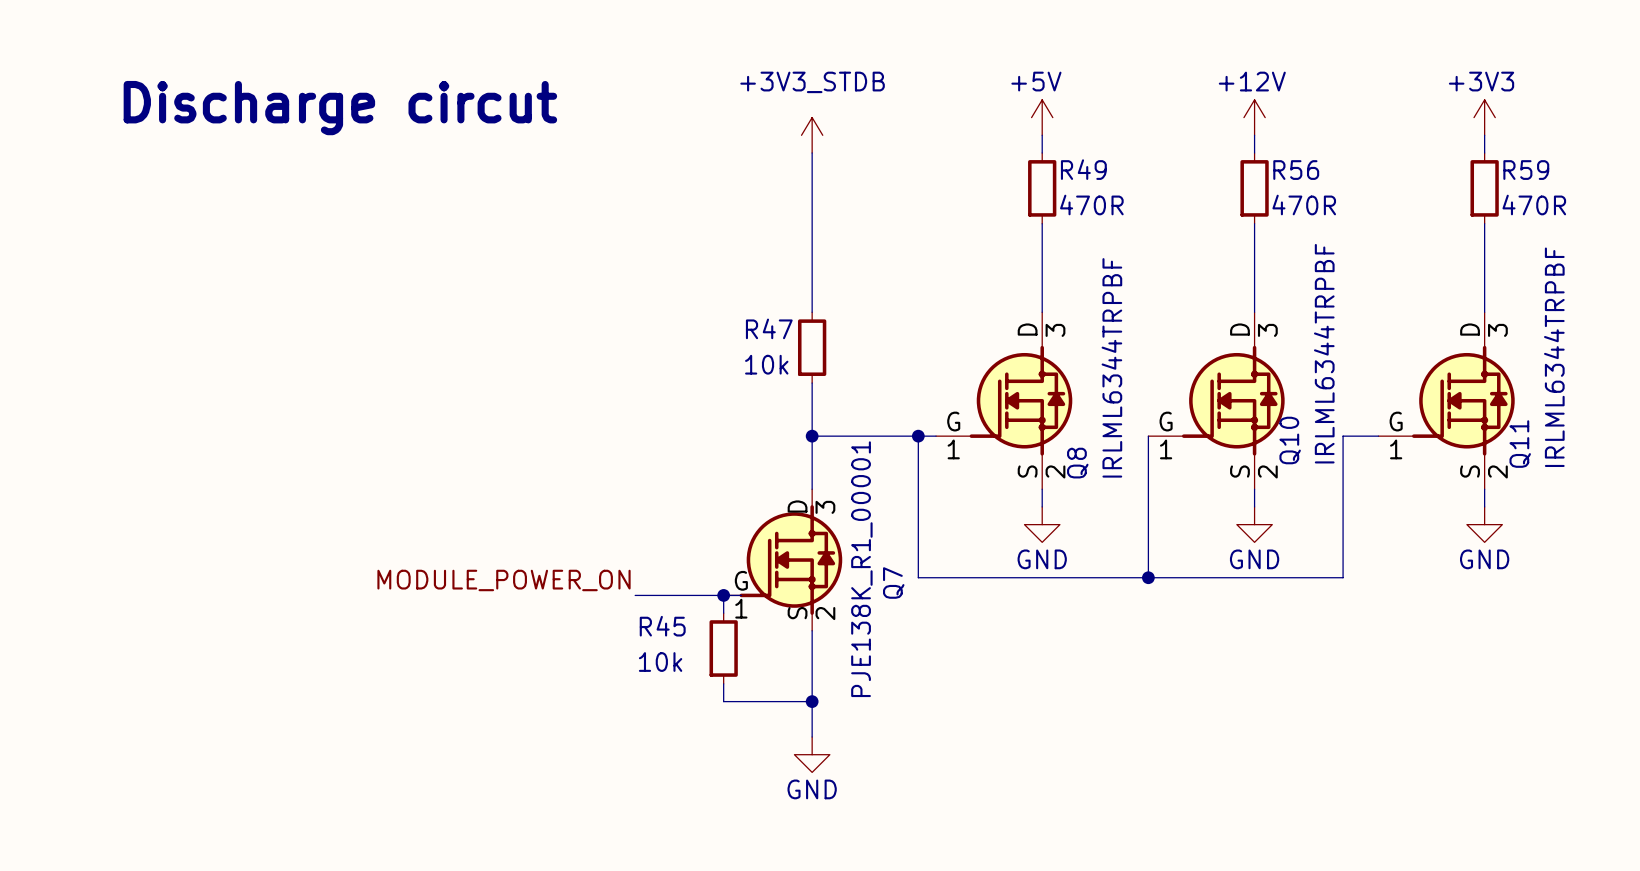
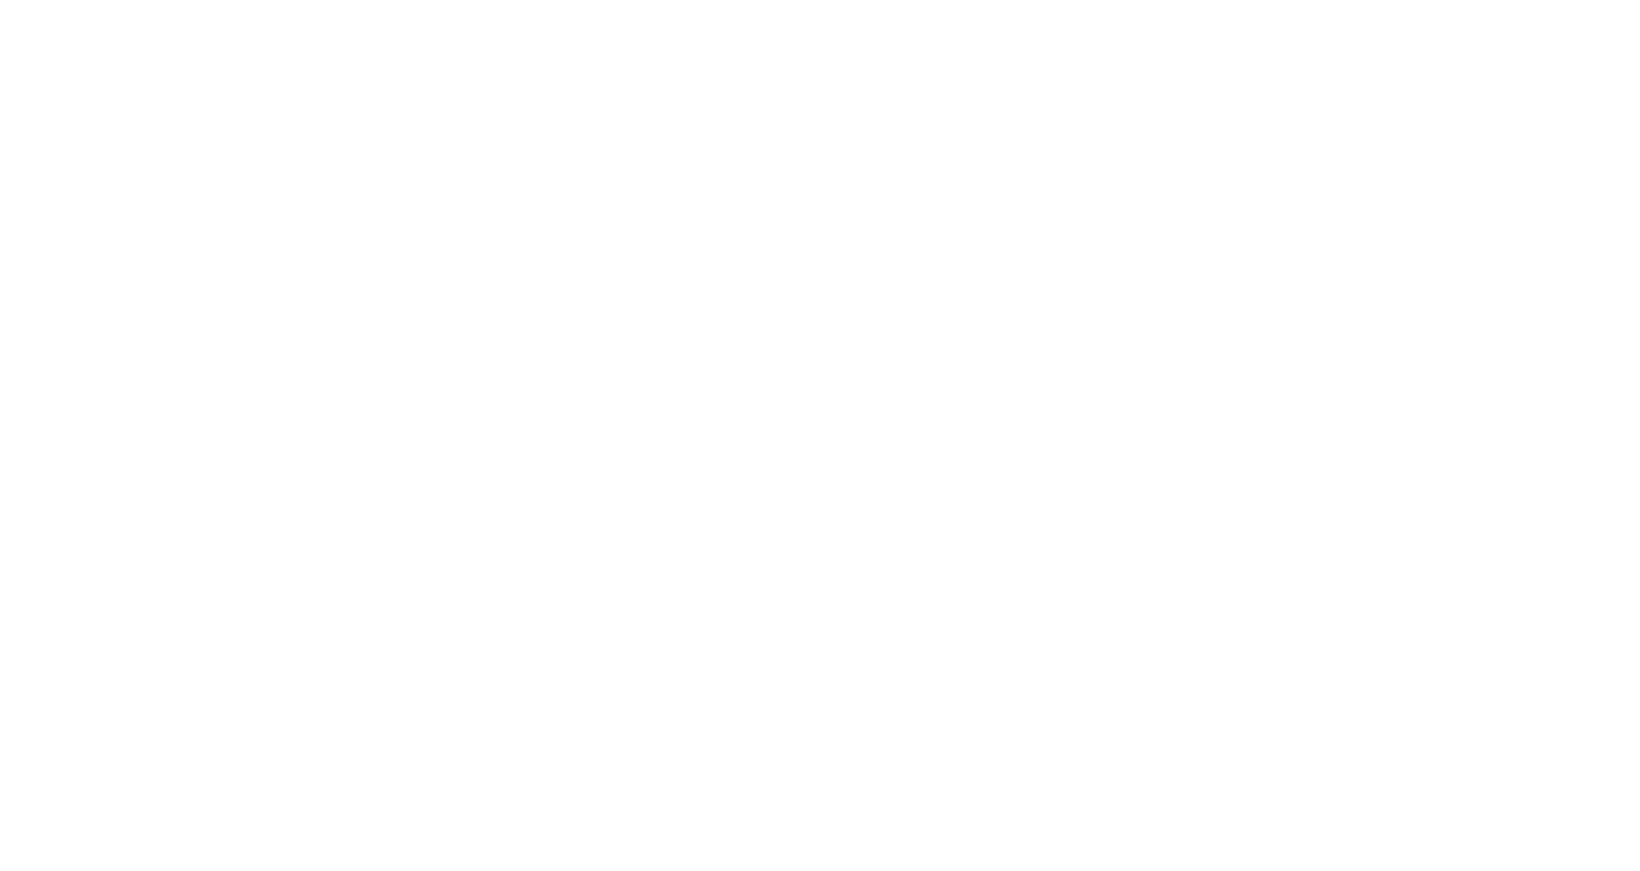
text: Discharge circut (340, 108) -> none
power symbol: +5V (1042, 117) -> none
power symbol: +12V (1254, 117) -> none
power symbol: +3V3 (1484, 117) -> none
power symbol: +3V3_STDB (812, 135) -> none
wire: (1042, 135) (1042, 153) -> none
wire: (1254, 135) (1254, 153) -> none
wire: (1484, 135) (1484, 153) -> none
wire: (812, 153) (812, 312) -> none
R49: (1042, 188) -> none
R56: (1254, 188) -> none
R59: (1484, 188) -> none
wire: (1042, 223) (1042, 312) -> none
wire: (1254, 223) (1254, 312) -> none
wire: (1484, 223) (1484, 312) -> none
R47: (812, 347) -> none
wire: (812, 383) (812, 489) -> none
Q8: (1004, 400) -> none
Q10: (1216, 400) -> none
Q11: (1446, 400) -> none
wire: (812, 436) (936, 436) -> none
junction: (812, 436) -> none
wire: (918, 436) (918, 577) (1343, 577) (1343, 436) (1378, 436) -> none
junction: (918, 436) -> none
wire: (1148, 436) (1148, 577) -> none
wire: (1042, 489) (1042, 506) -> none
wire: (1254, 489) (1254, 506) -> none
wire: (1484, 489) (1484, 506) -> none
power symbol: GND (1042, 524) -> none
power symbol: GND (1254, 524) -> none
power symbol: GND (1484, 524) -> none
Q7: (782, 560) -> none
junction: (1148, 577) -> none
label: MODULE_POWER_ON (504, 580) -> none
wire: (635, 595) (741, 595) -> none
wire: (723, 595) (723, 613) -> none
junction: (723, 595) -> none
wire: (812, 630) (812, 737) -> none
R45: (723, 648) -> none
wire: (723, 683) (723, 701) (812, 701) -> none
junction: (812, 701) -> none
power symbol: GND (812, 754) -> none

